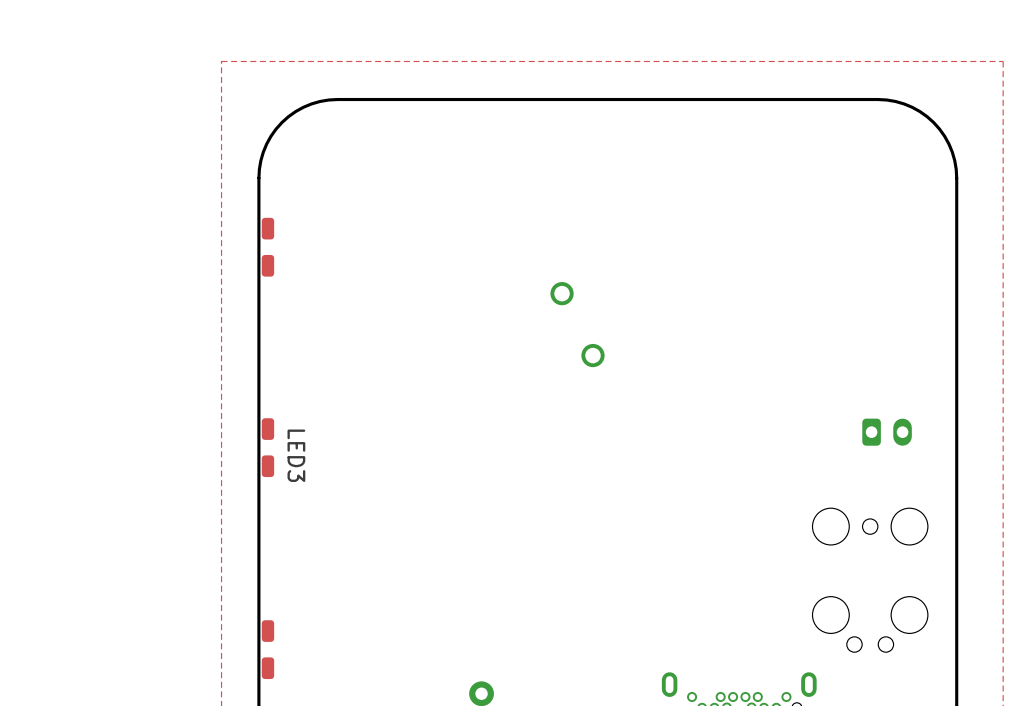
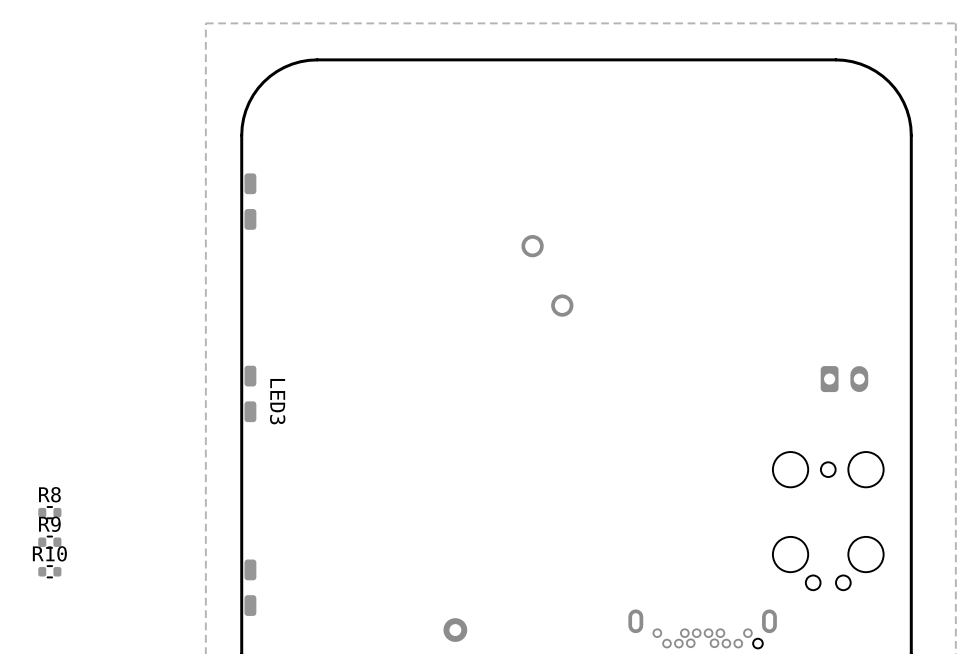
R8: none -> (49, 512)
R9: none -> (49, 542)
R10: none -> (49, 571)

